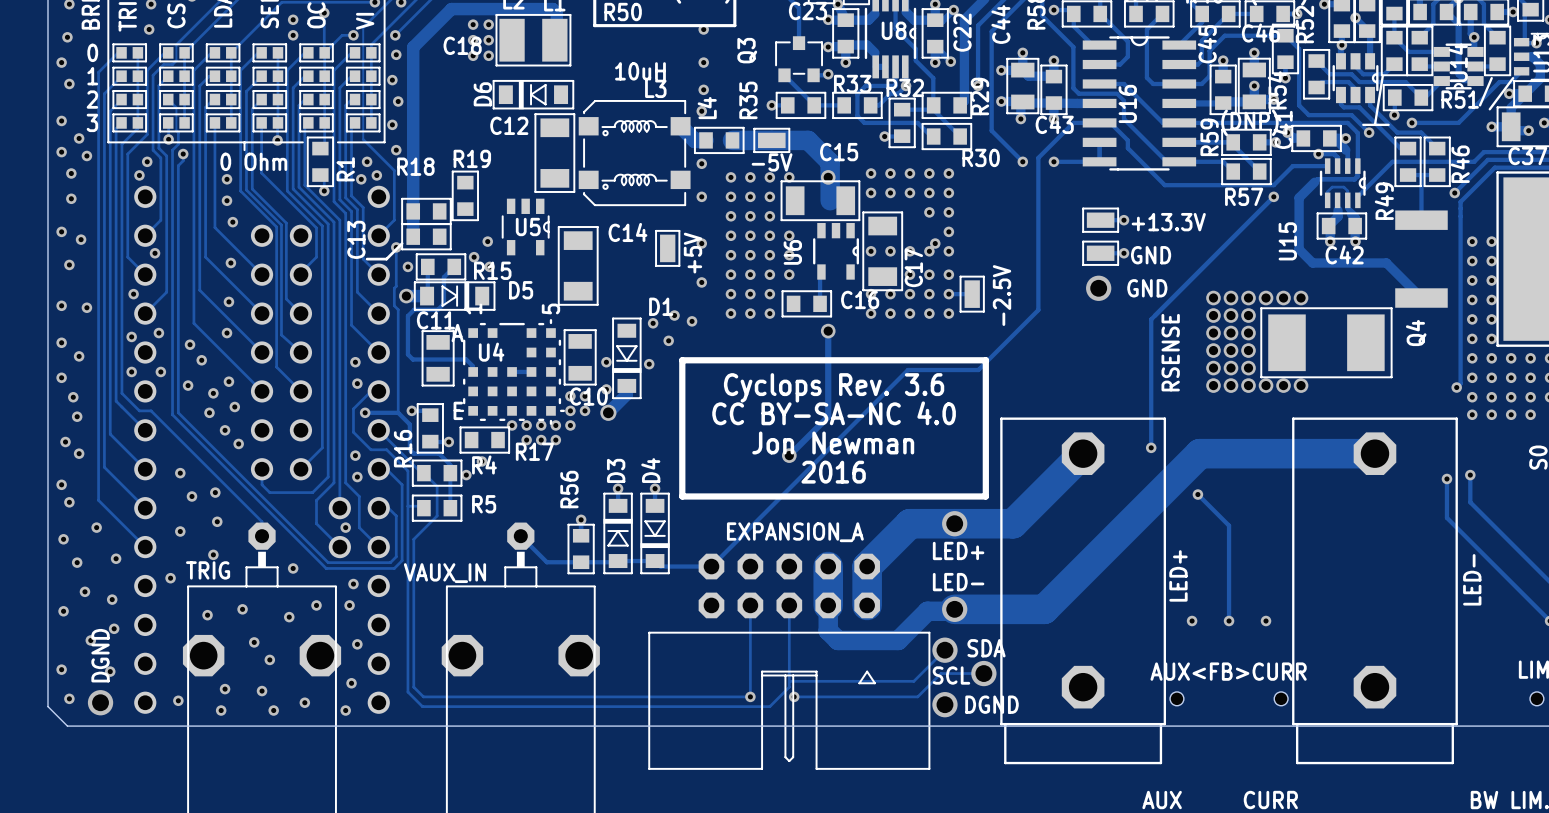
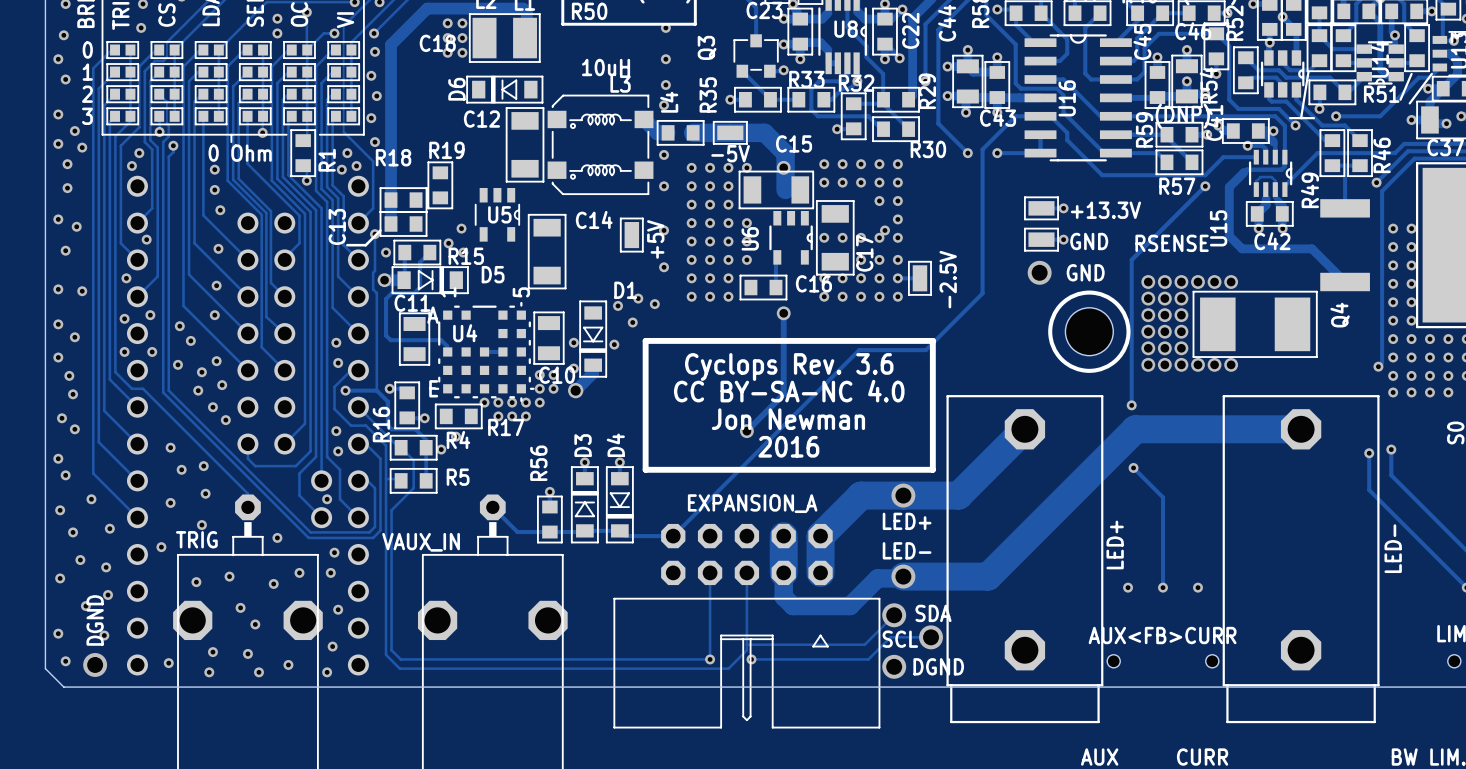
track: (1195, 274) (1151, 319) (1151, 447) -> (1131, 259) (1131, 405)
drawing: none -> [1048, 290, 1131, 373]
hole: none -> (1089, 331)
RSENSE name rotation: 0° (1170, 352) -> 90° clockwise (1172, 243)
RSENSE name position: RSENSE (1170, 352) -> RSENSE (1172, 243)
via position: (1151, 447) -> (1131, 405)

